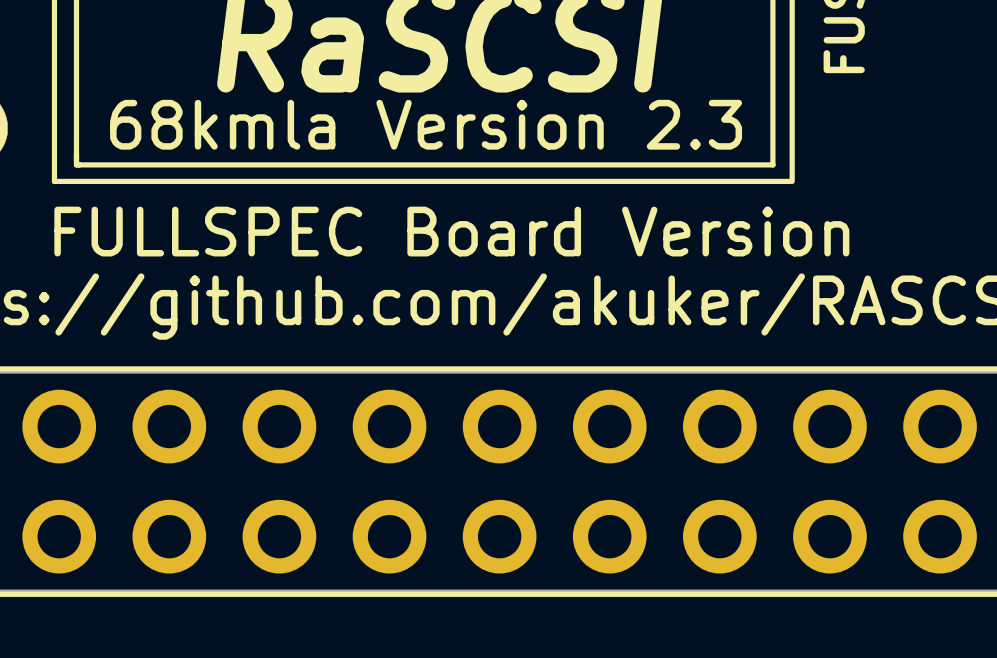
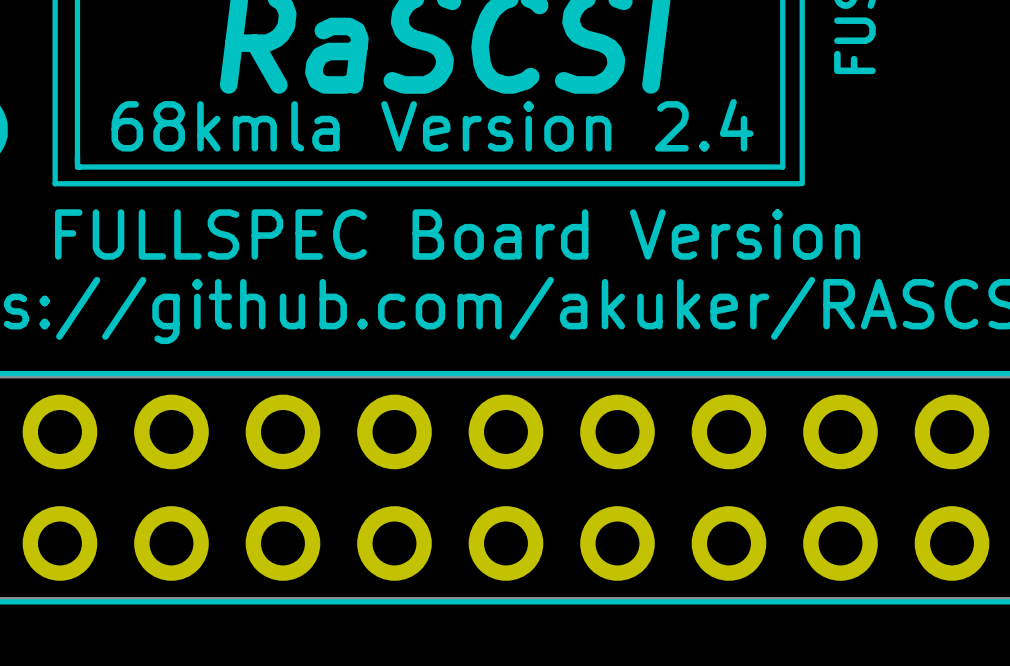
text: 68kmla Version 2.3 (426, 124) -> 68kmla Version 2.4 (432, 125)

